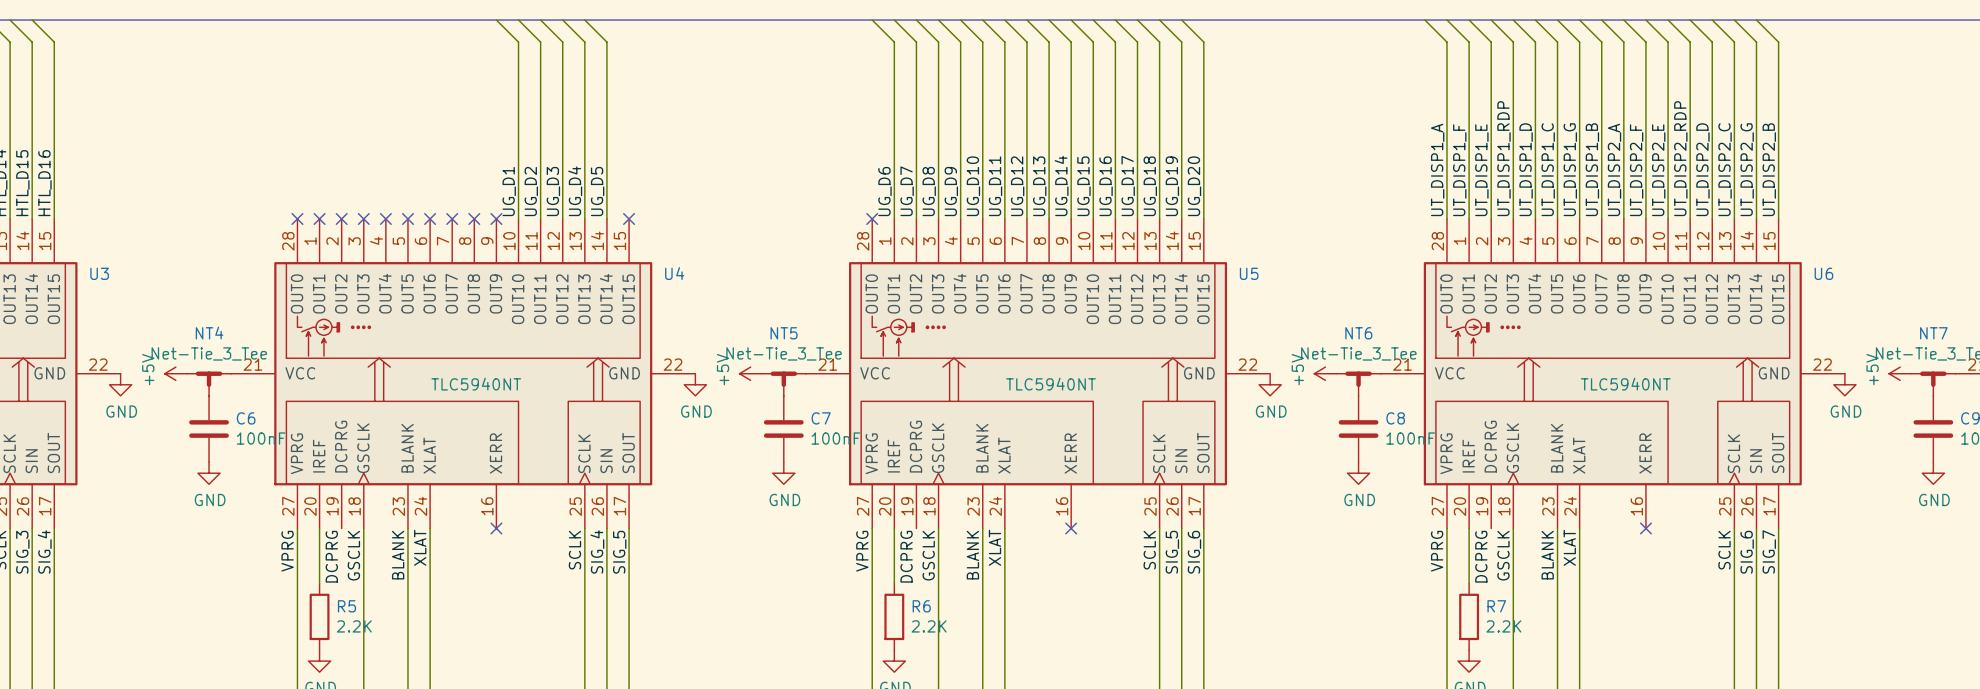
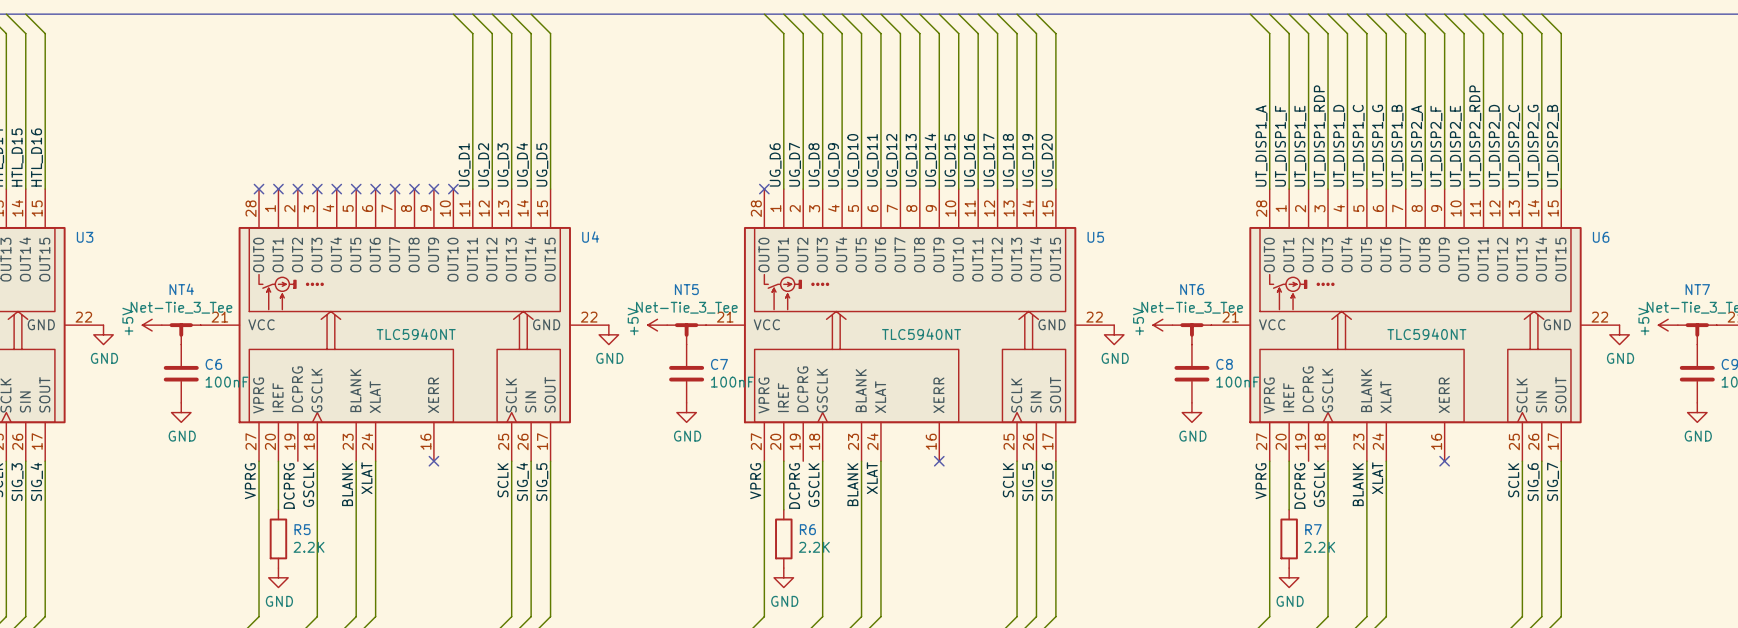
wire: (496, 20) (518, 42) (518, 218) -> (531, 14) (550, 33) (550, 189)
label: UG_D1 (509, 191) -> none
label: UG_D2 (531, 191) -> UG_D1 (464, 164)
label: UG_D3 (553, 191) -> UG_D2 (484, 164)
label: UG_D4 (575, 191) -> UG_D3 (503, 164)
label: UG_D5 (597, 191) -> UG_D4 (522, 164)
label: none -> UG_D5 (542, 164)
no-connect mark: none -> (453, 189)
no-connect mark: (629, 218) -> none

